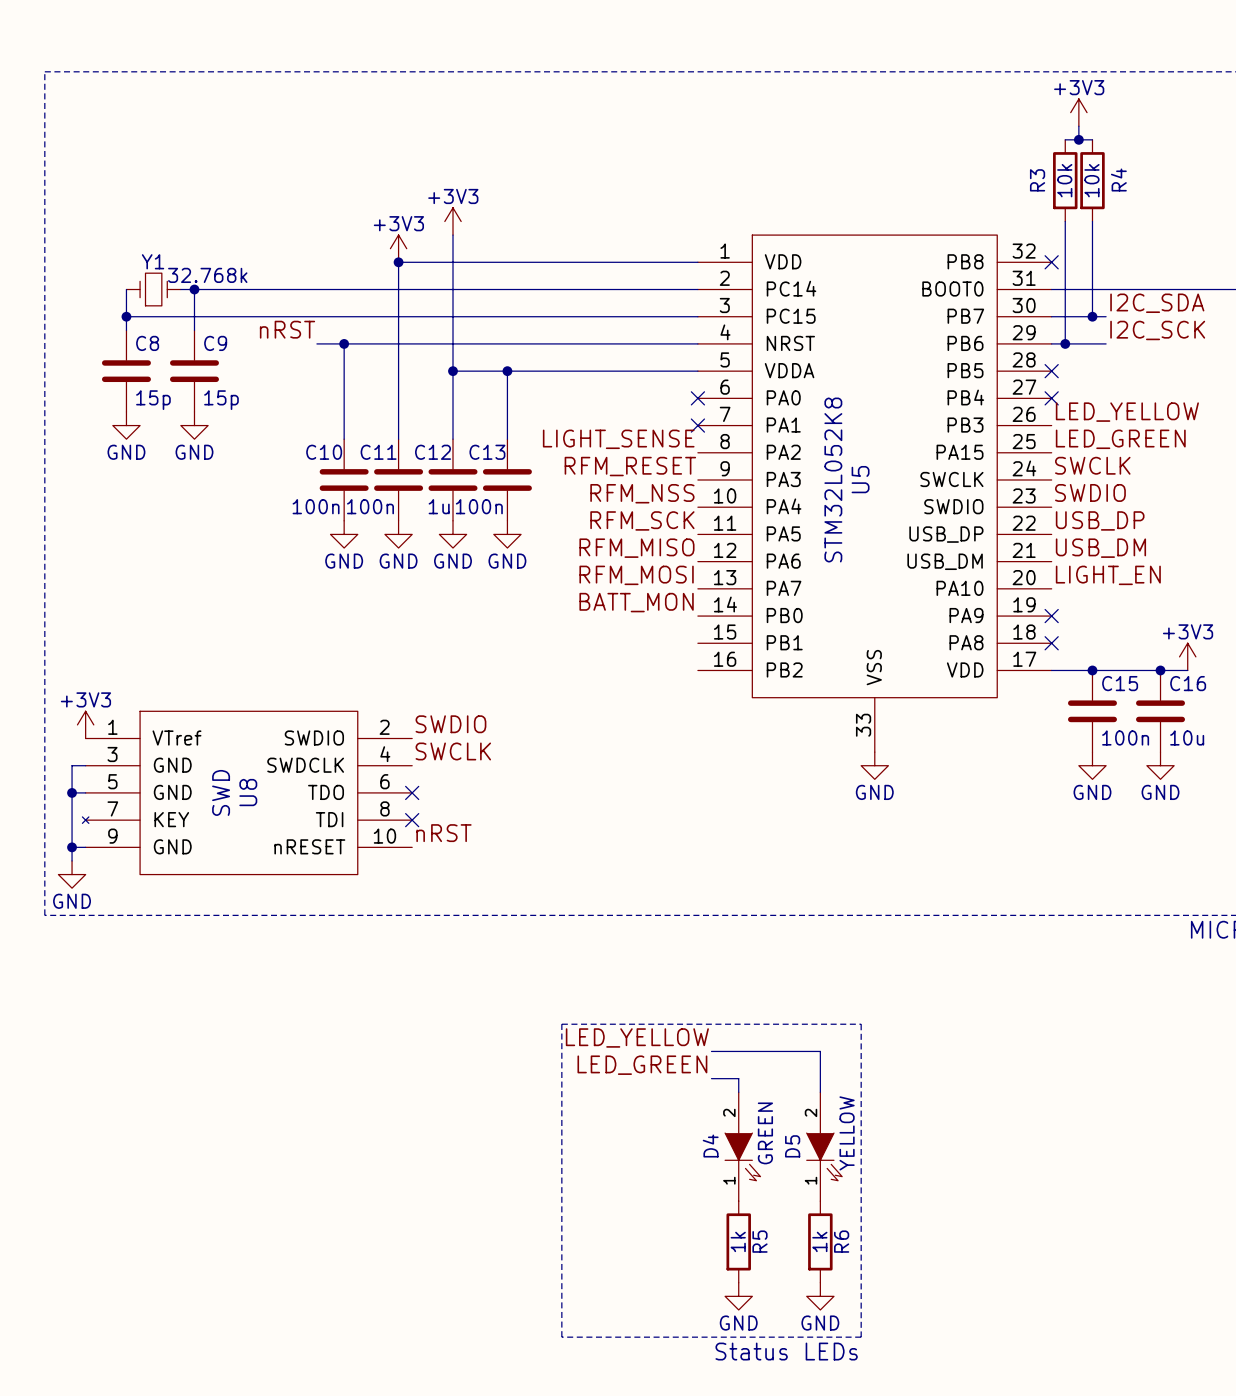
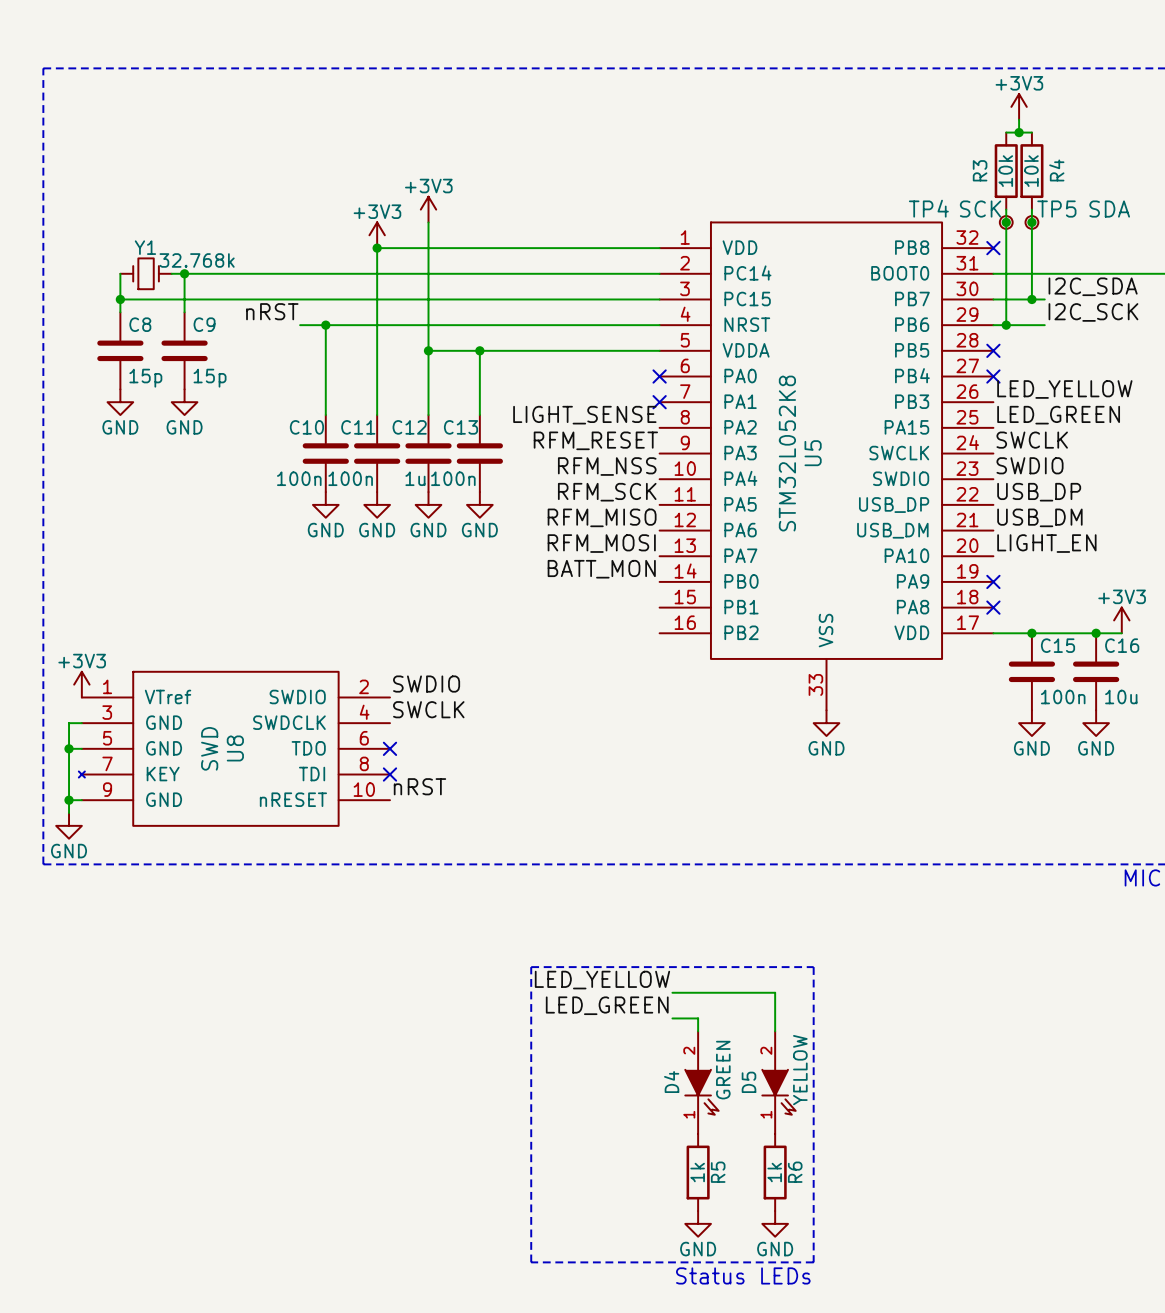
TP4: none -> SCK (1006, 222)
junction: none -> (1006, 222)
TP5: none -> SDA (1031, 222)
junction: none -> (1031, 222)

